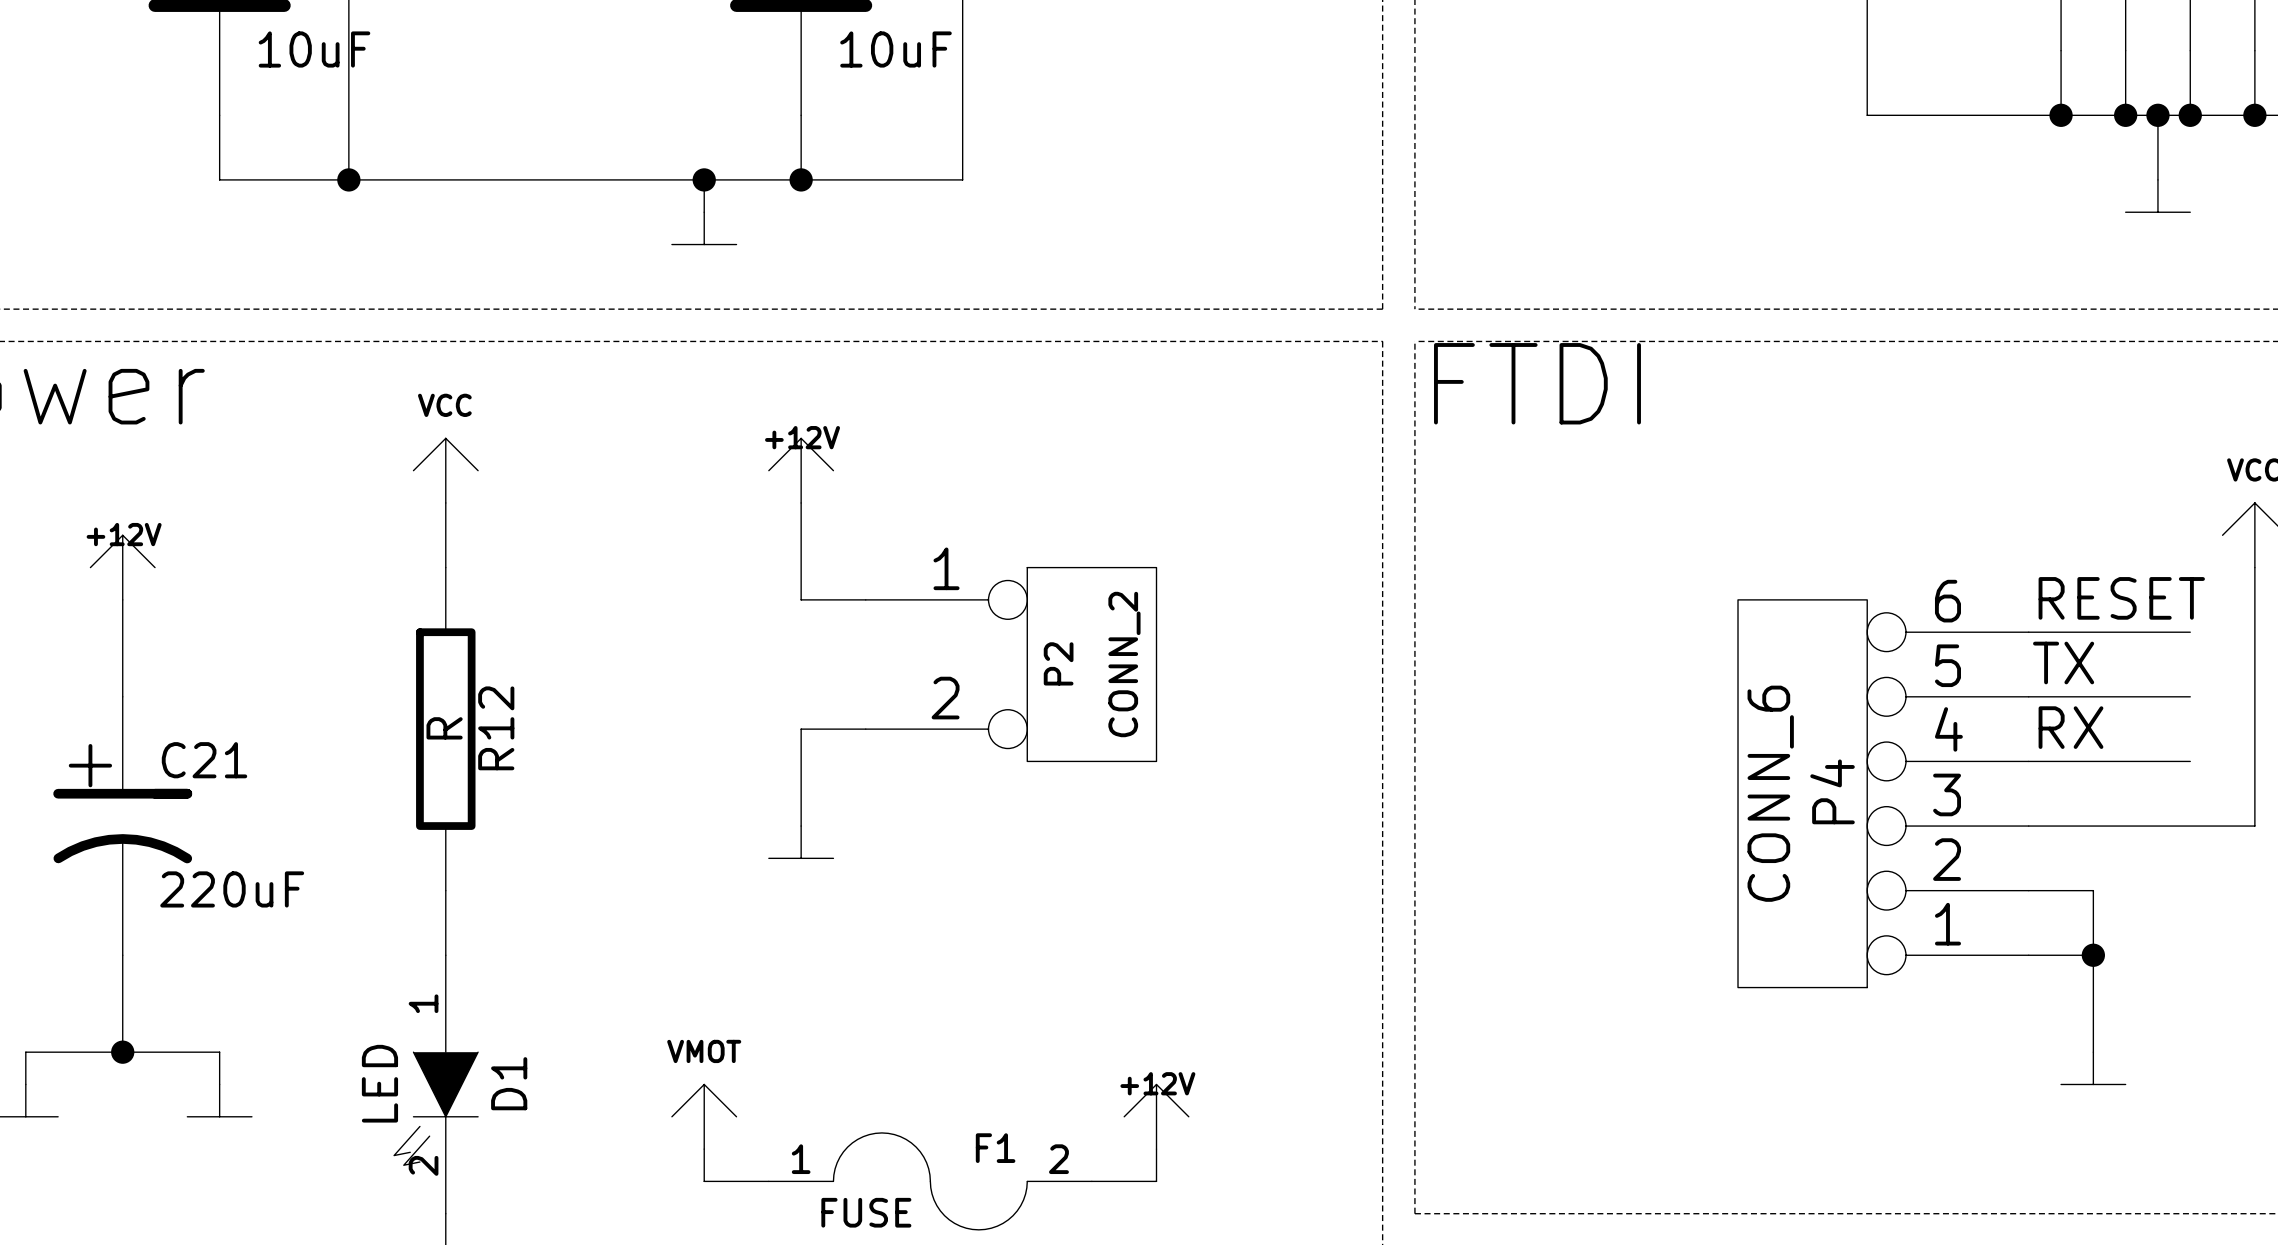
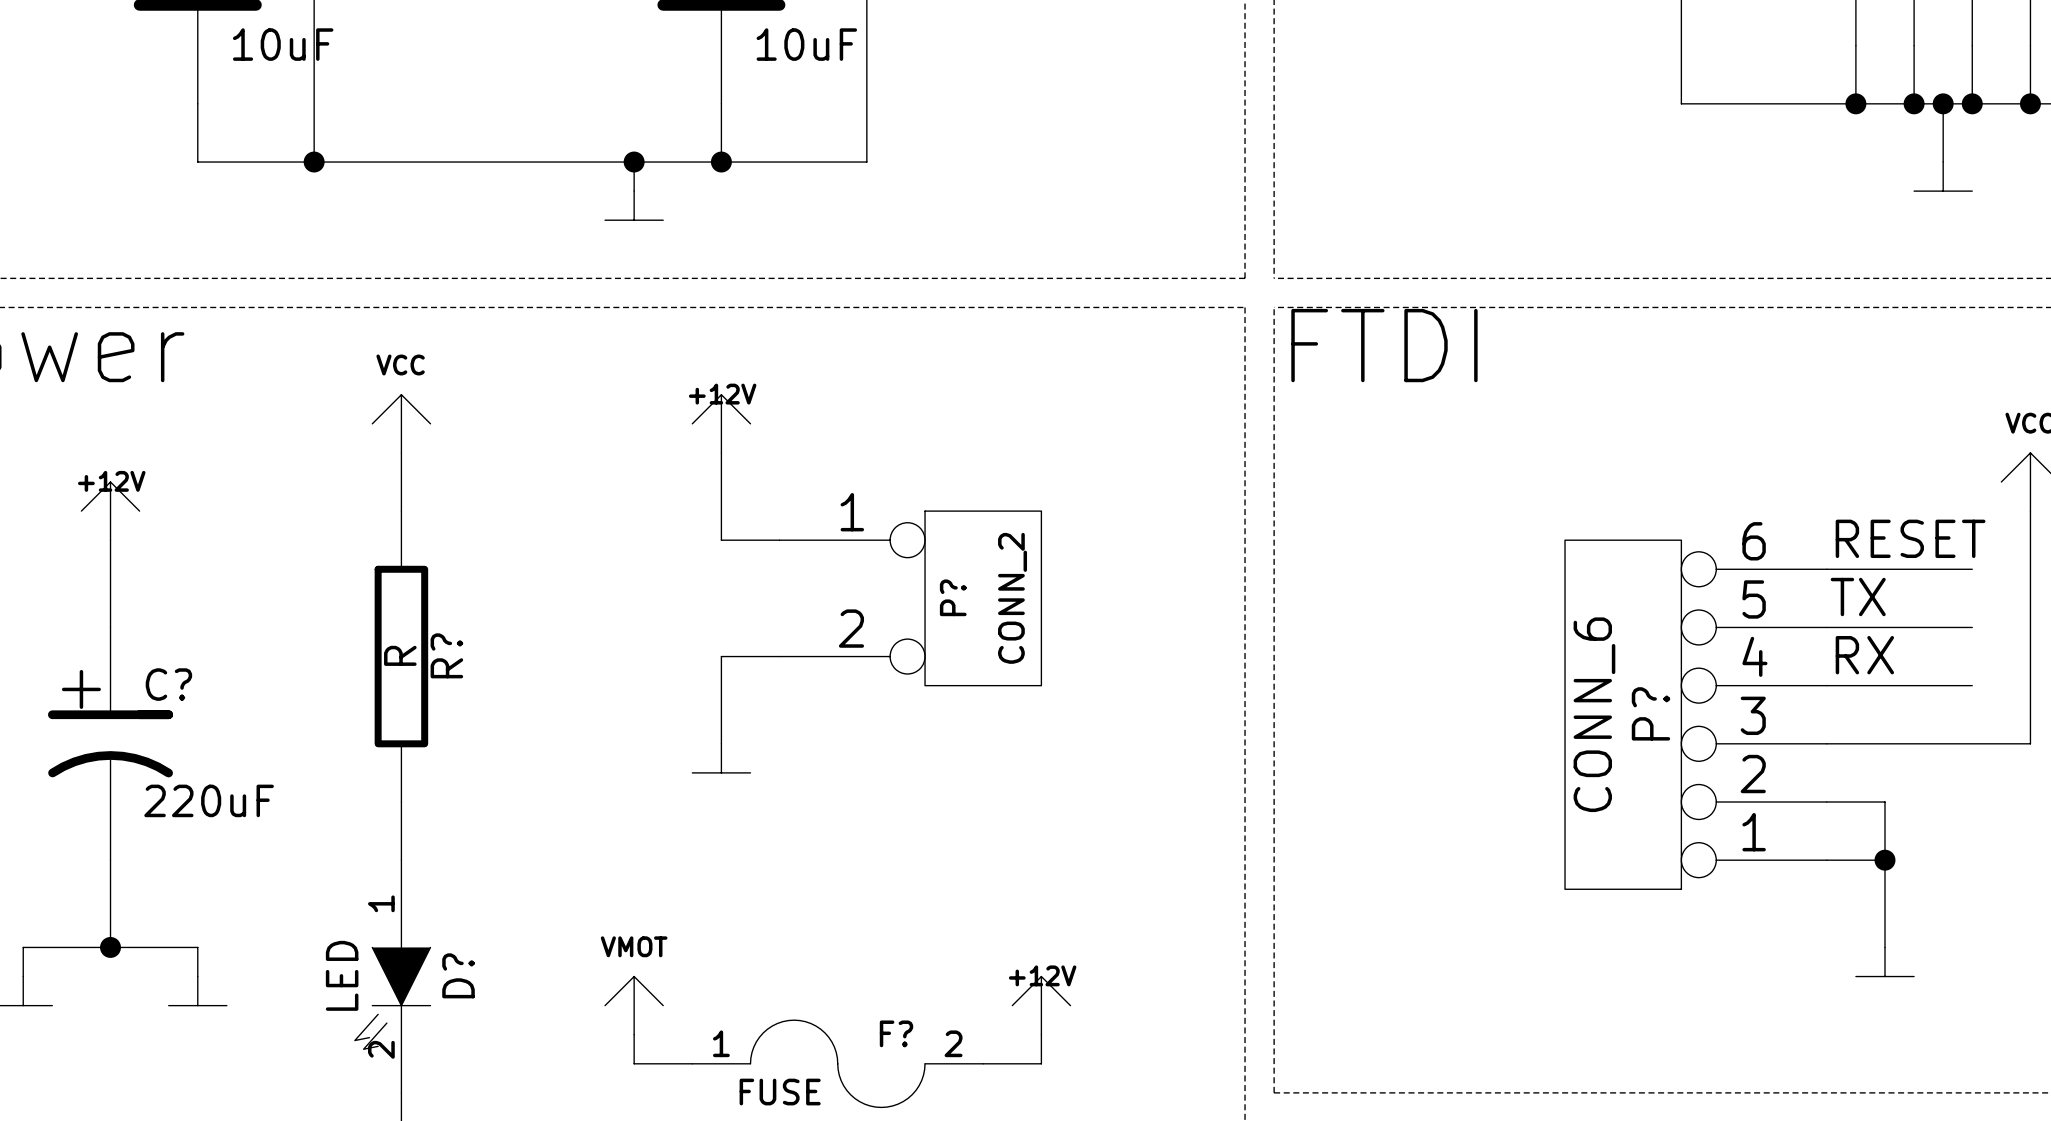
P2 name: P2 (1058, 663) -> P? (953, 597)
R12 name: R12 (496, 728) -> R? (446, 655)
C21 name: C21 (204, 760) -> C? (168, 684)
P4 name: P4 (1832, 791) -> P? (1650, 713)
D1 name: D1 (509, 1083) -> D? (458, 975)
F1 name: F1 (995, 1148) -> F? (896, 1033)

